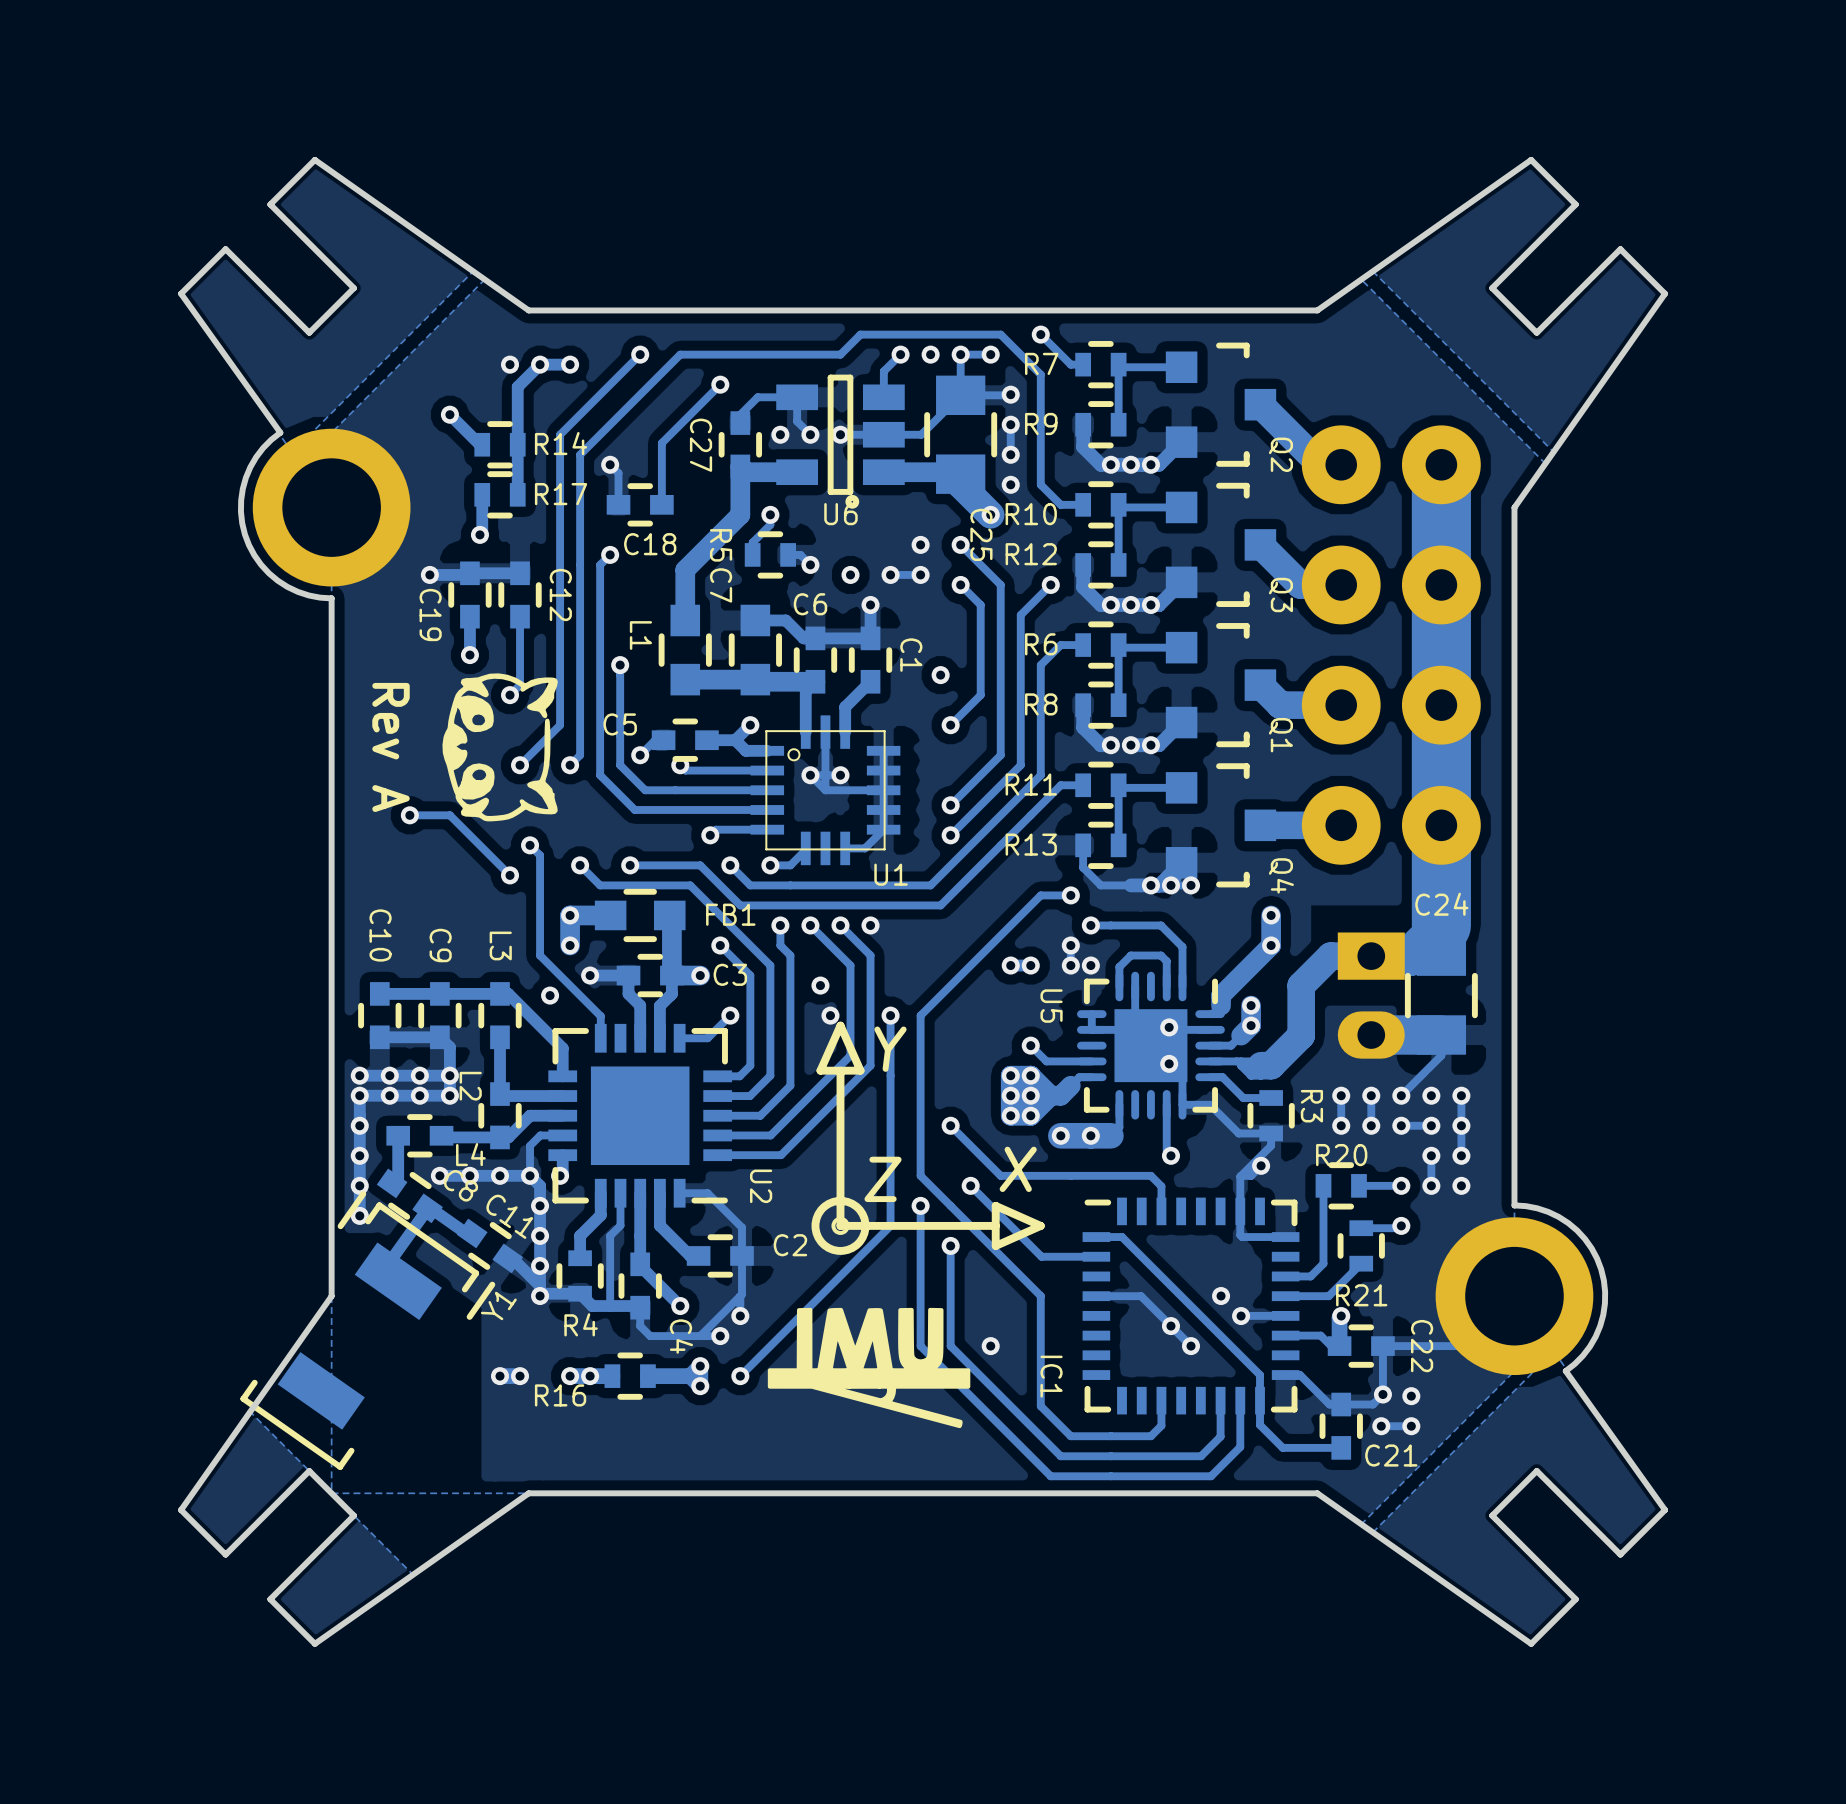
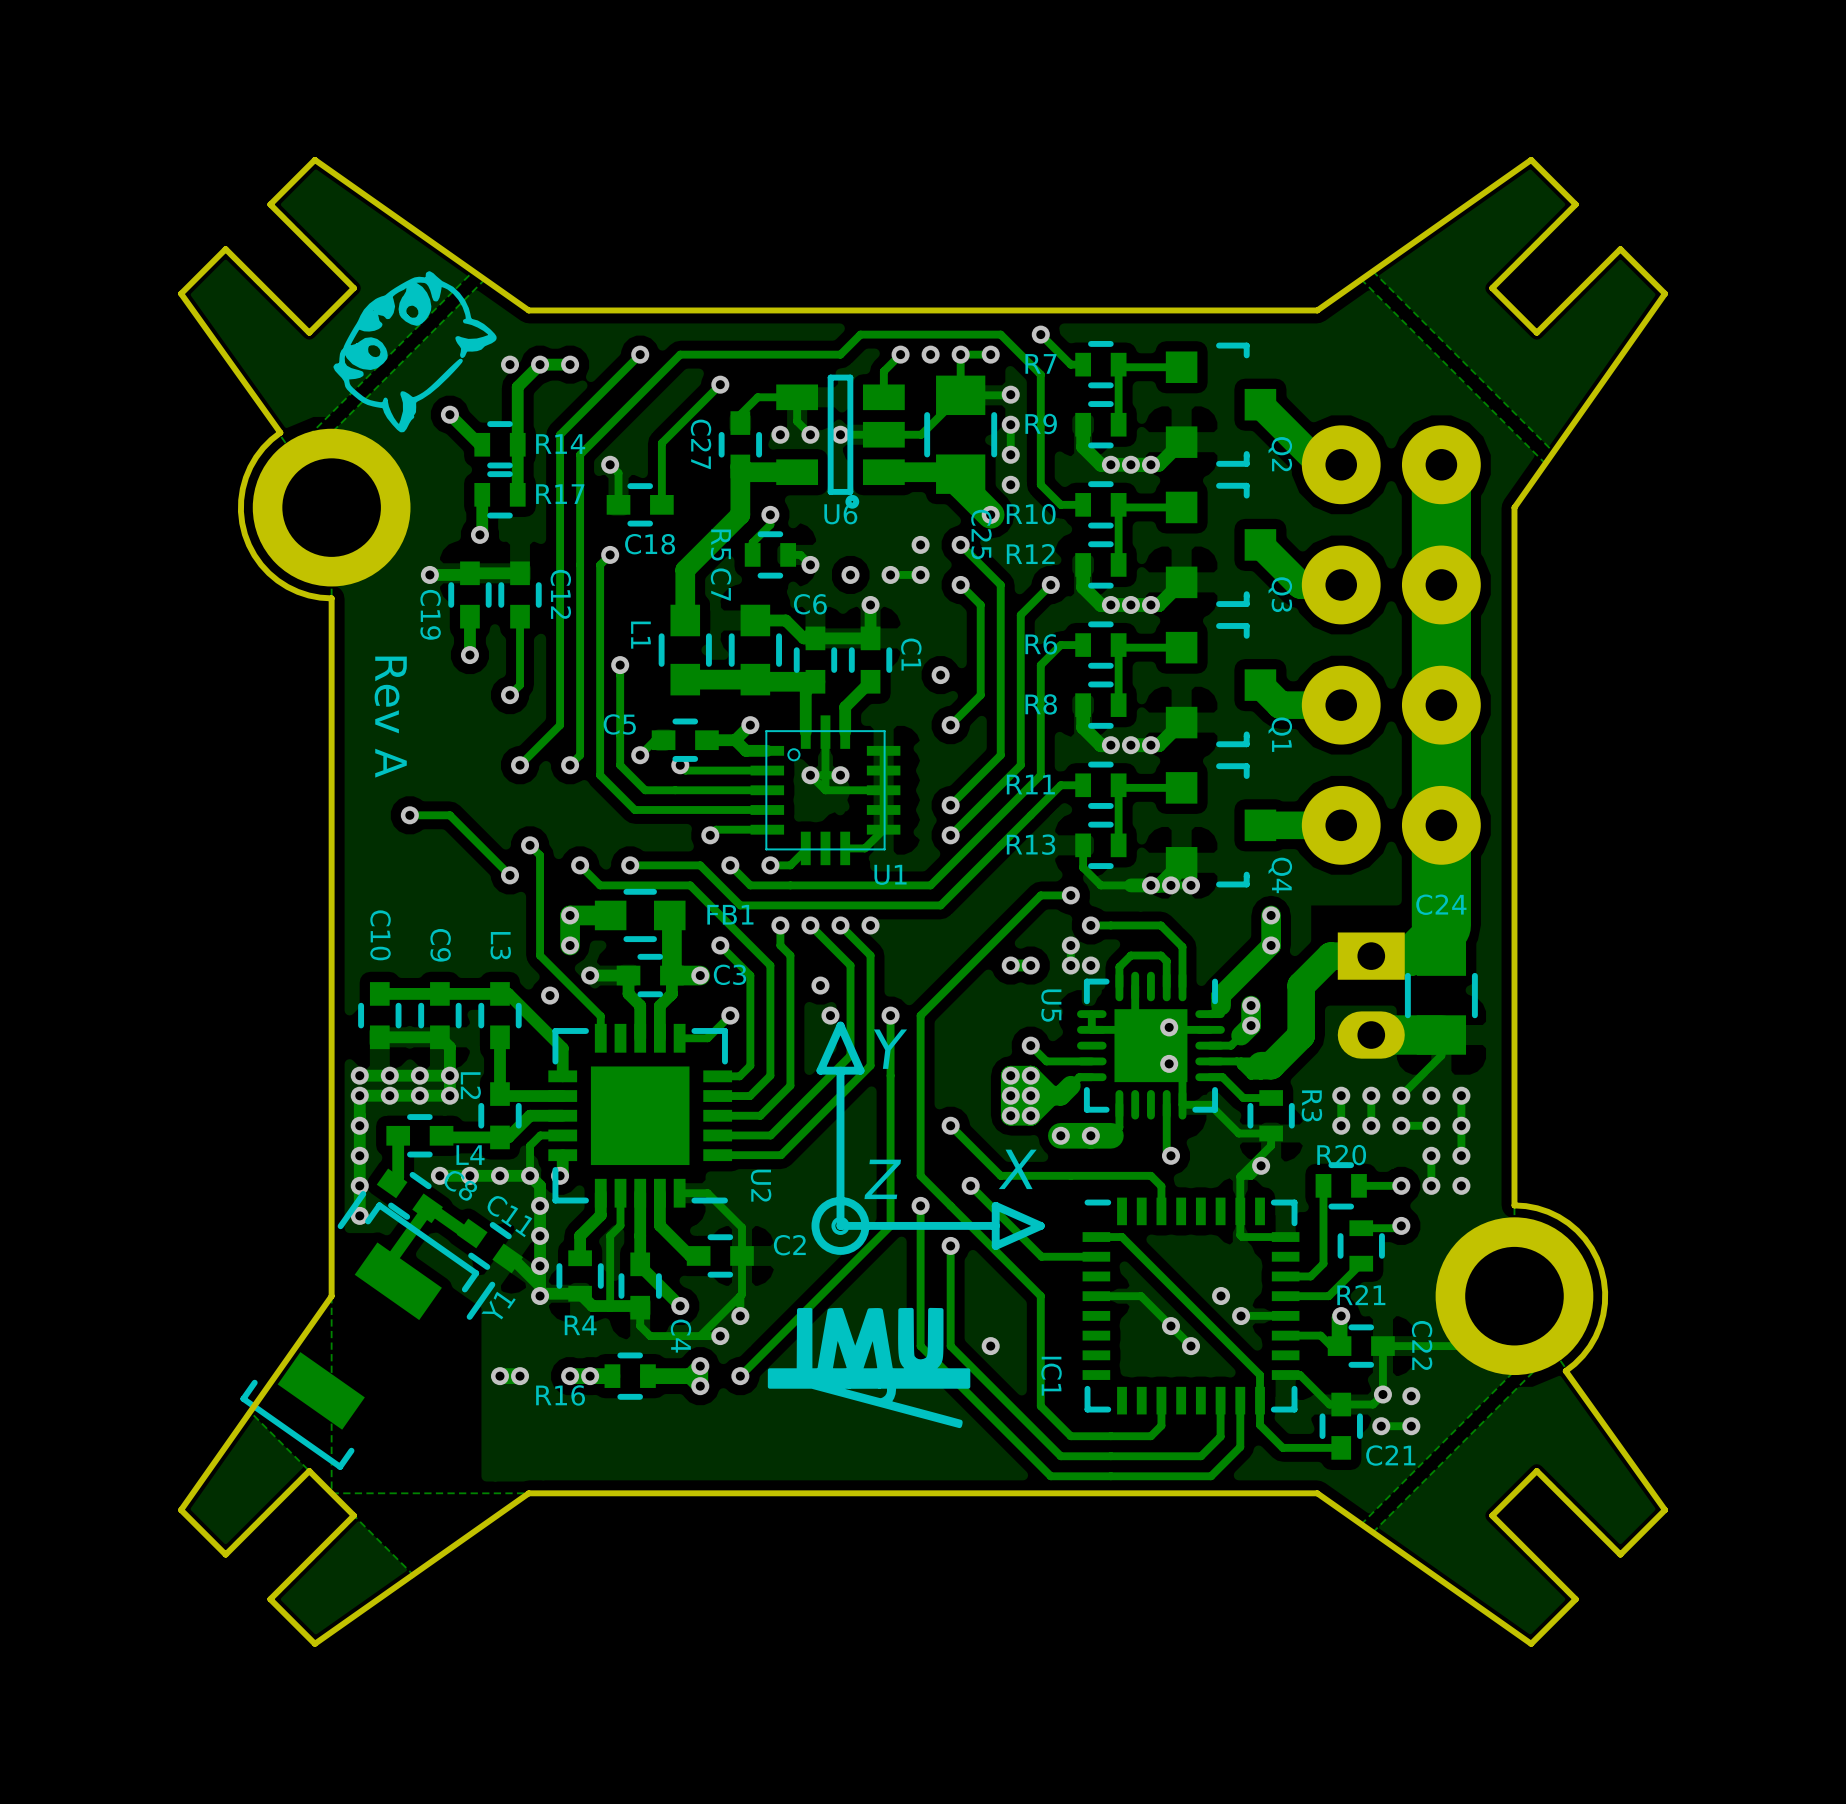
drawing: none -> [333, 271, 497, 433]
drawing: [442, 673, 558, 822] -> none
text position: Rev A (391, 747) -> Rev A (390, 717)

